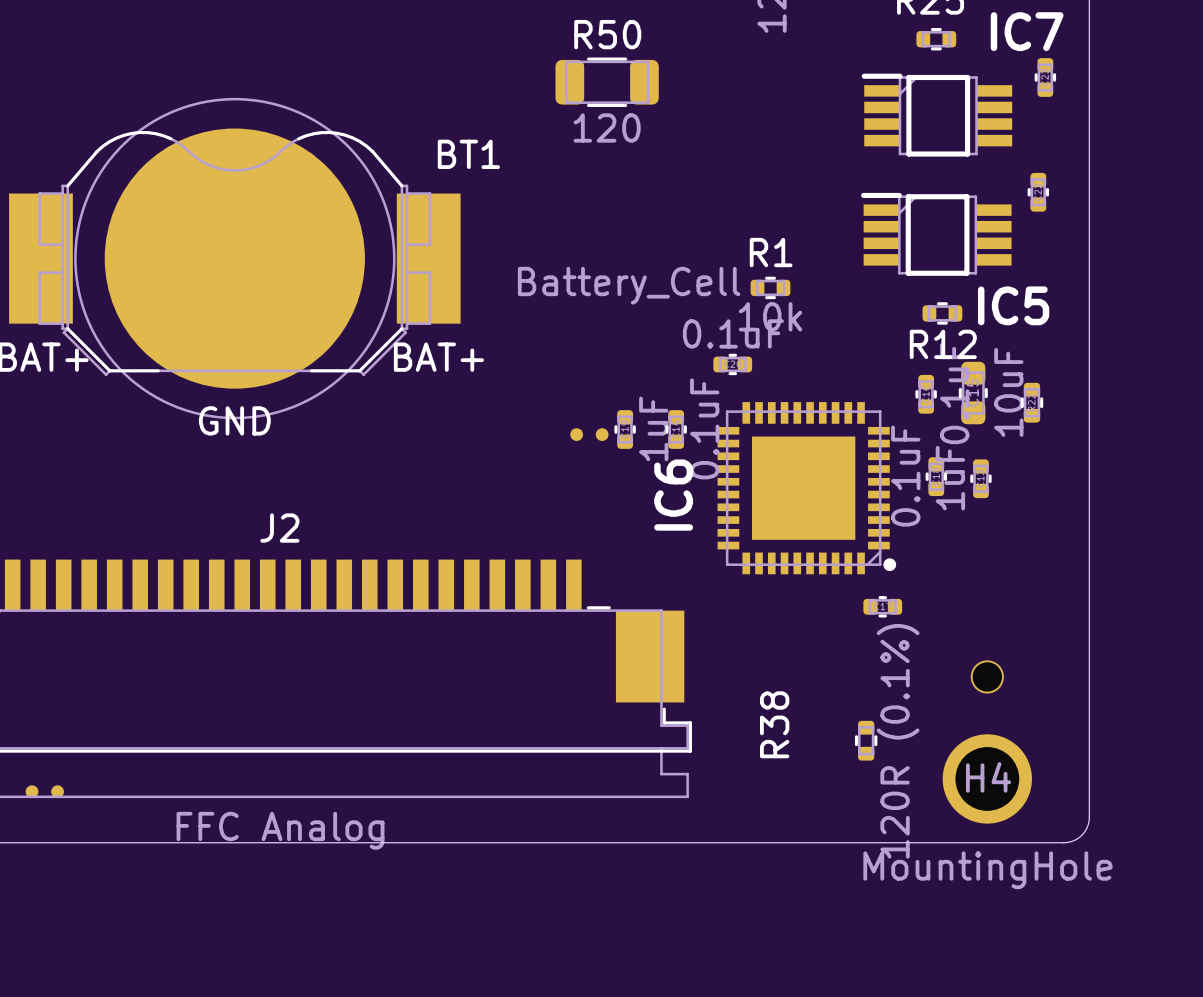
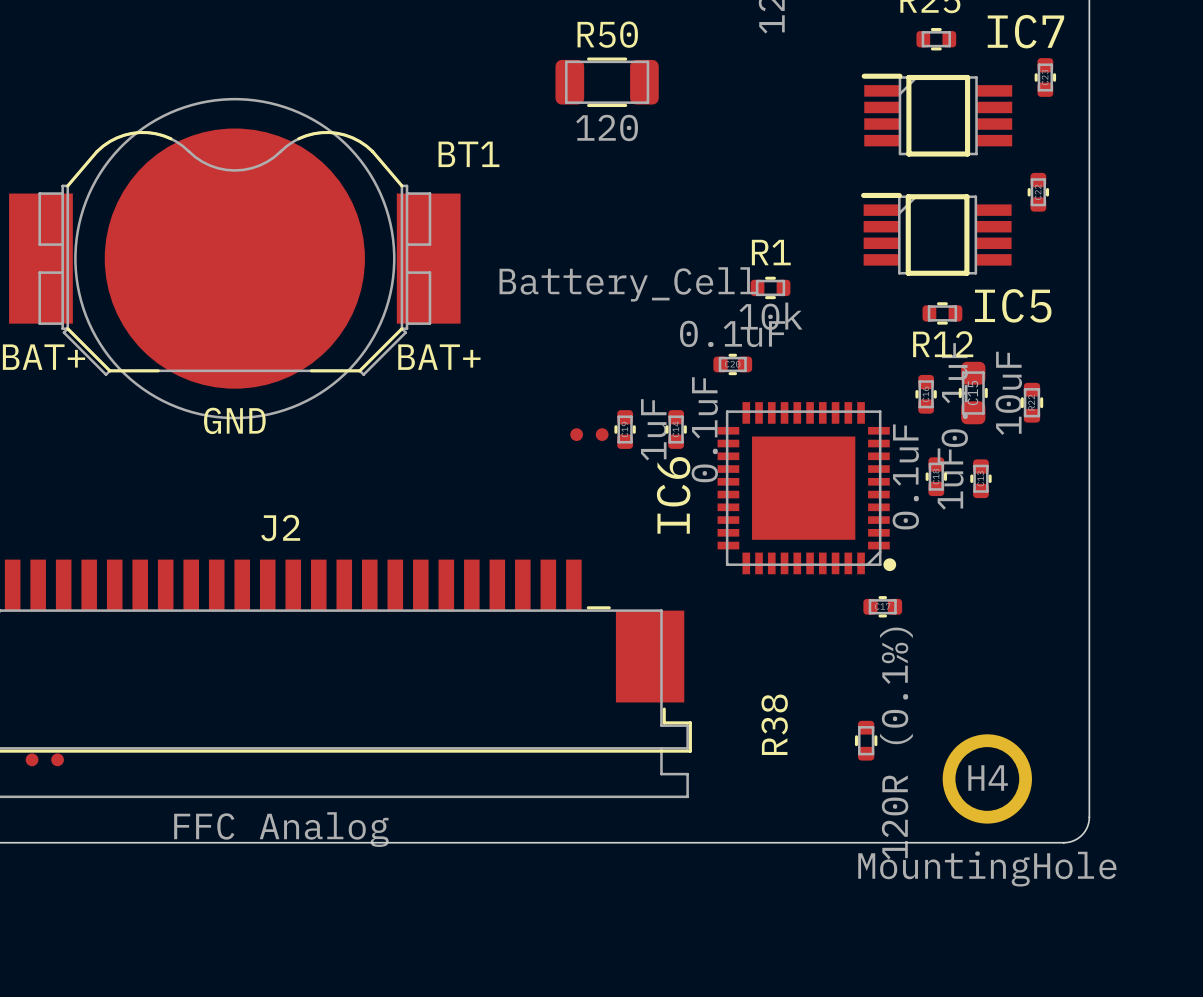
part: (987, 676) -> none
part position: (44, 791) -> (44, 759)

